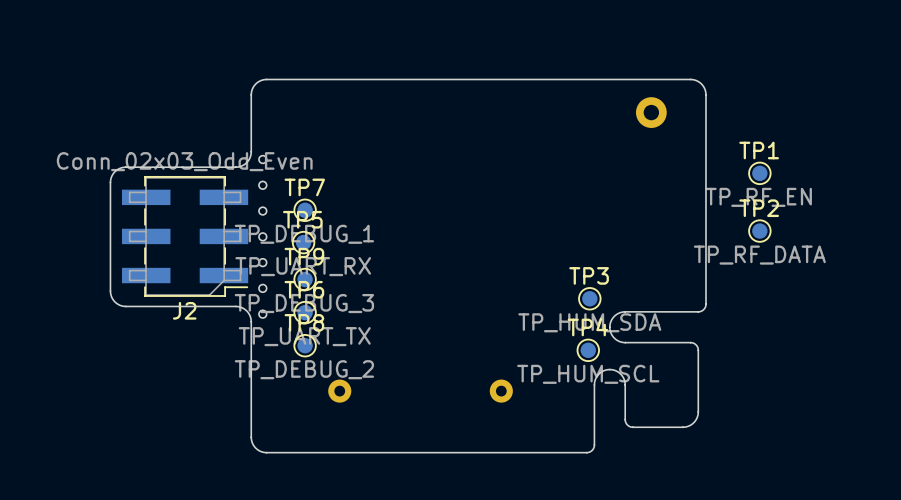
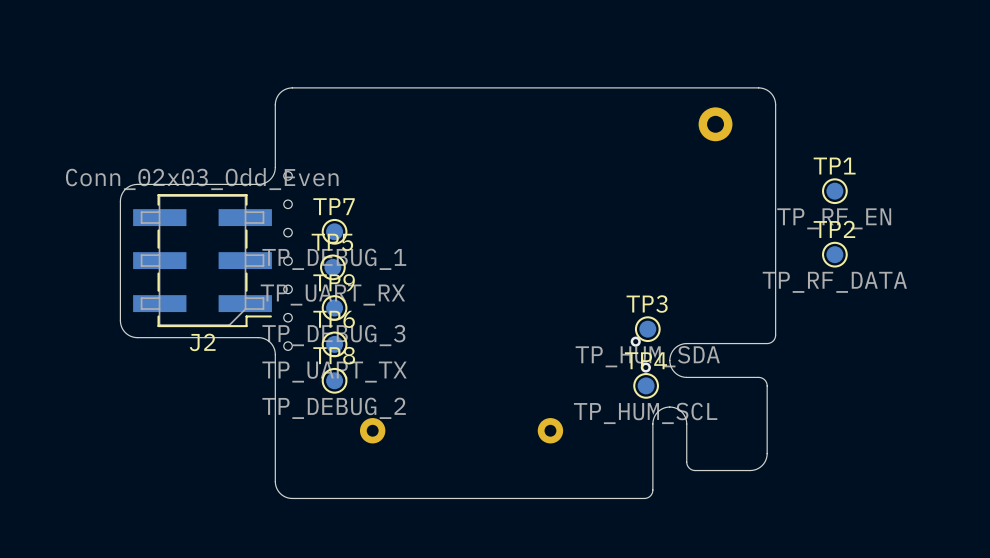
via: none -> (635, 341)
via: none -> (645, 367)

